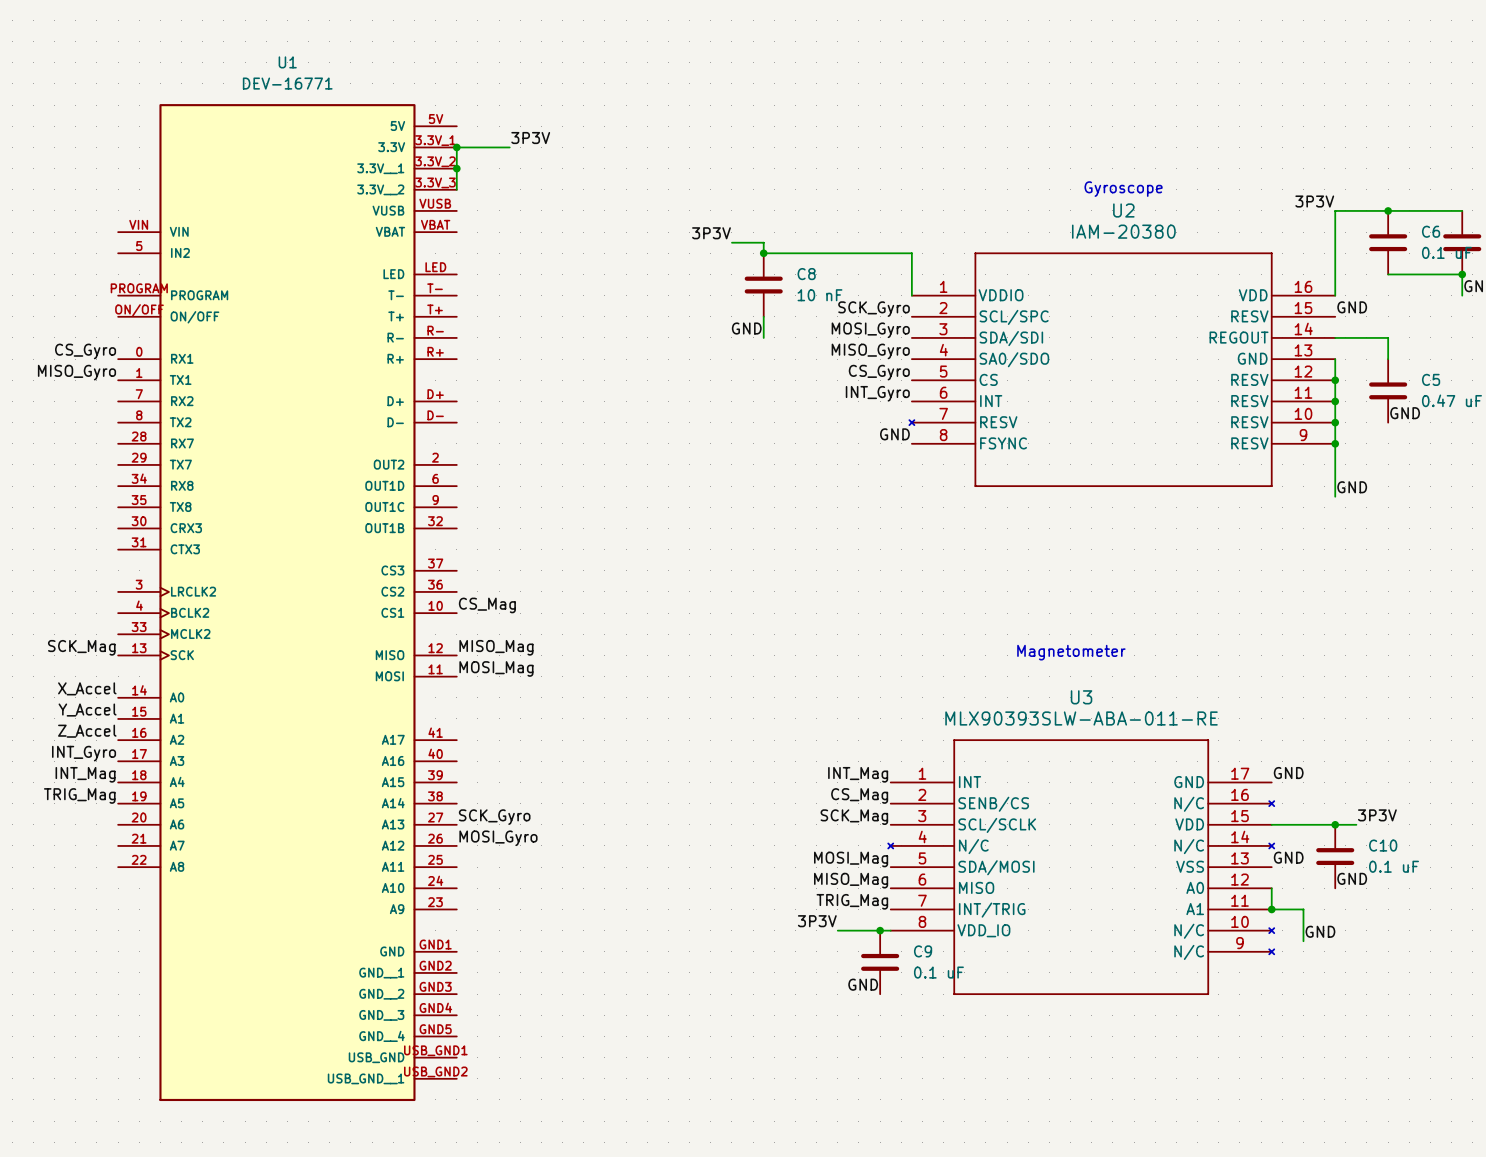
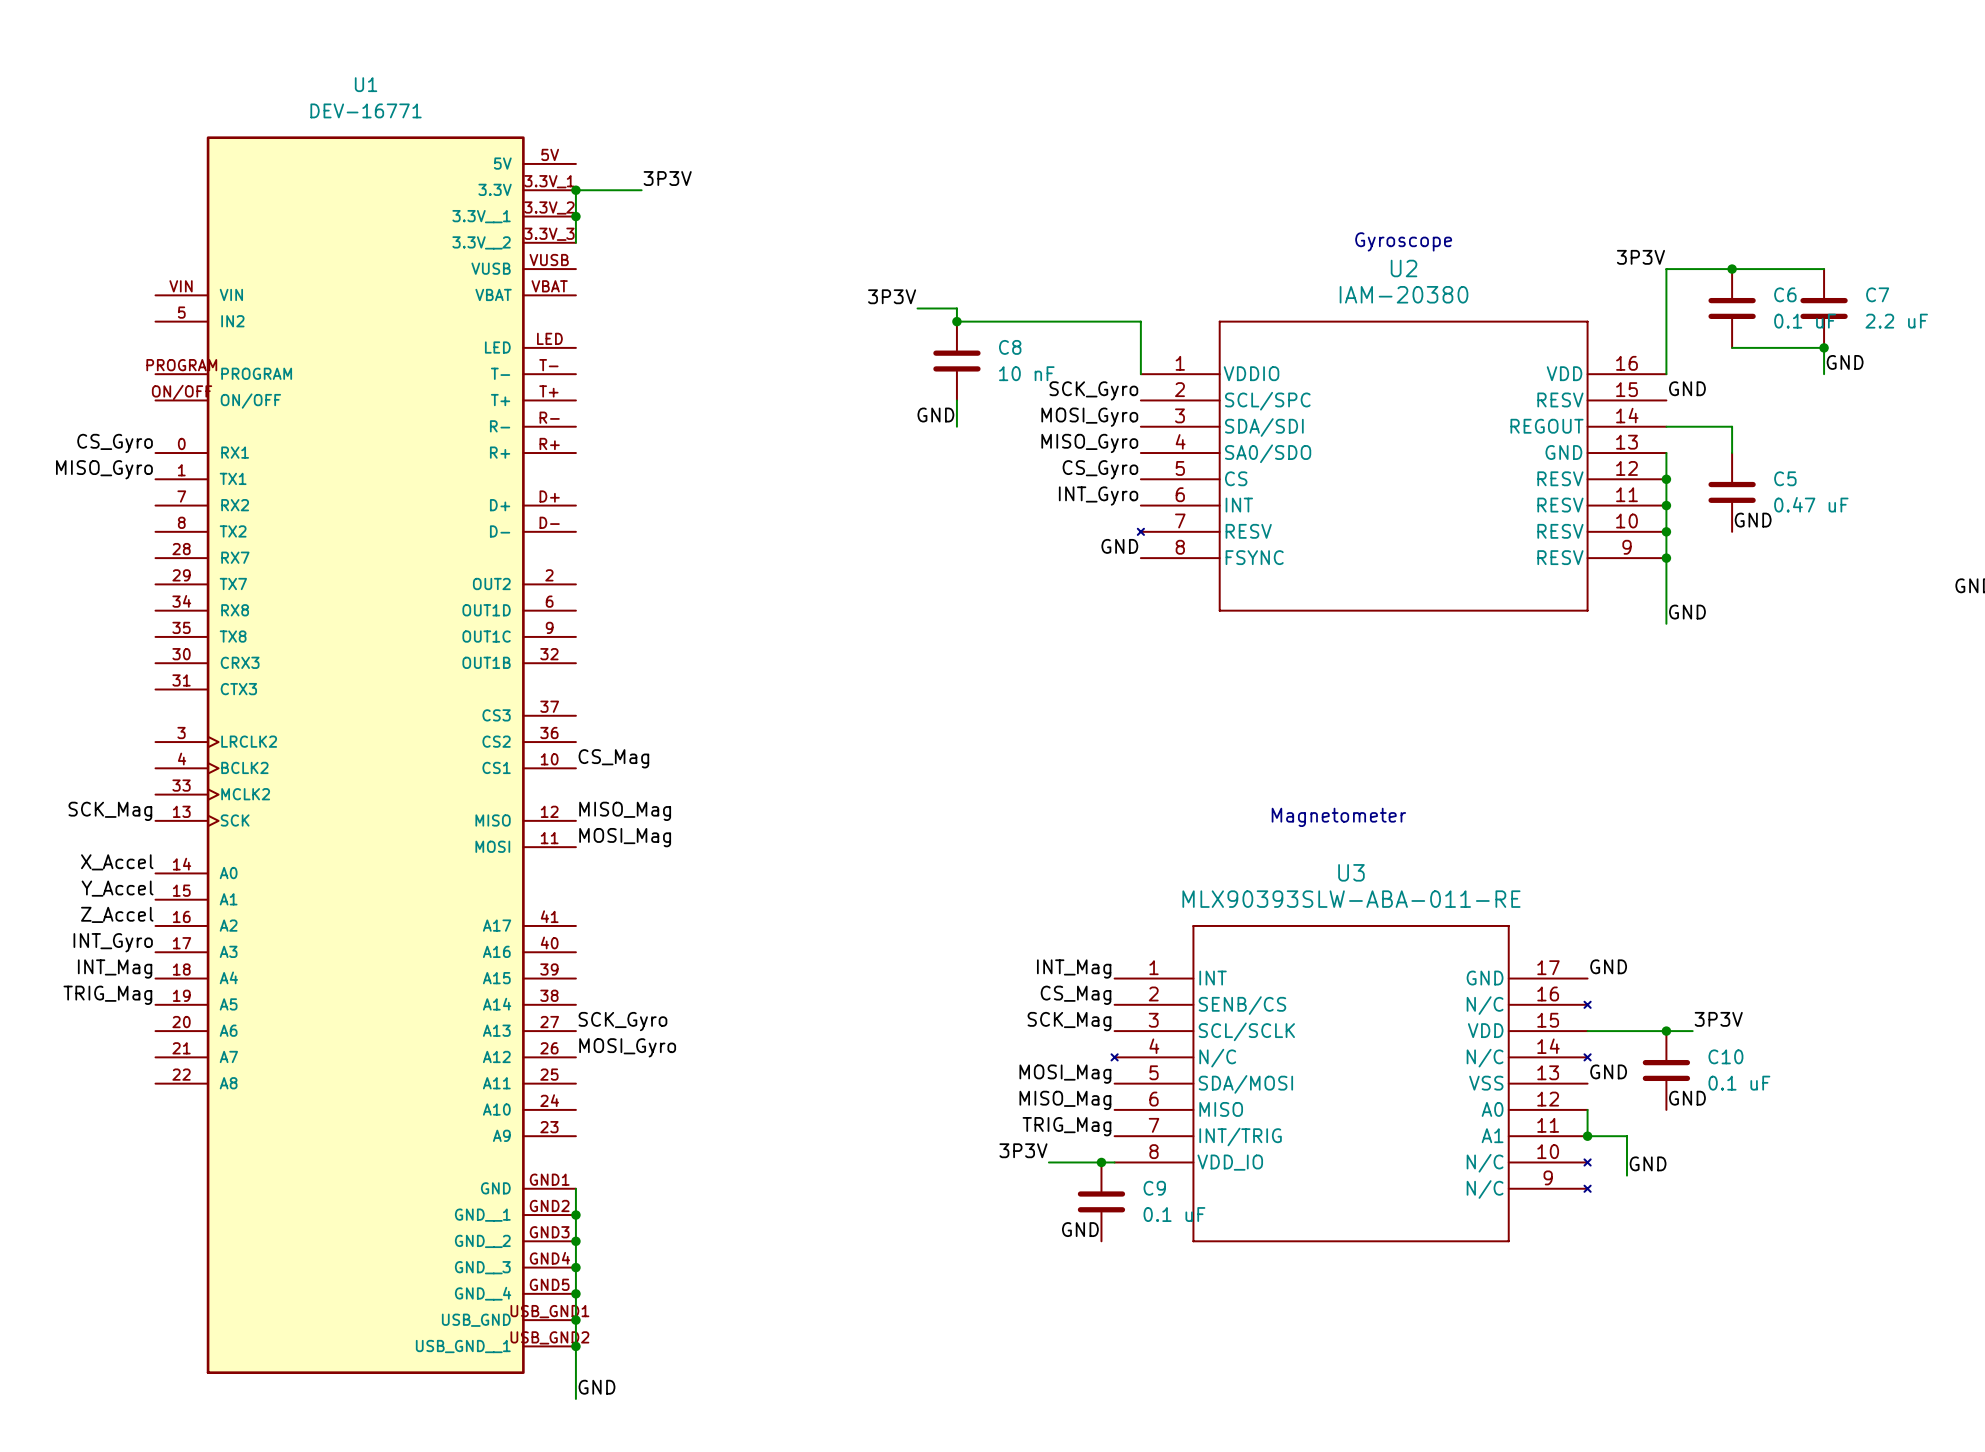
wire: none -> (575, 1188) (575, 1398)
junction: none -> (575, 1215)
junction: none -> (575, 1241)
junction: none -> (575, 1267)
junction: none -> (575, 1293)
junction: none -> (575, 1320)
junction: none -> (575, 1346)
label: none -> GND (596, 1387)

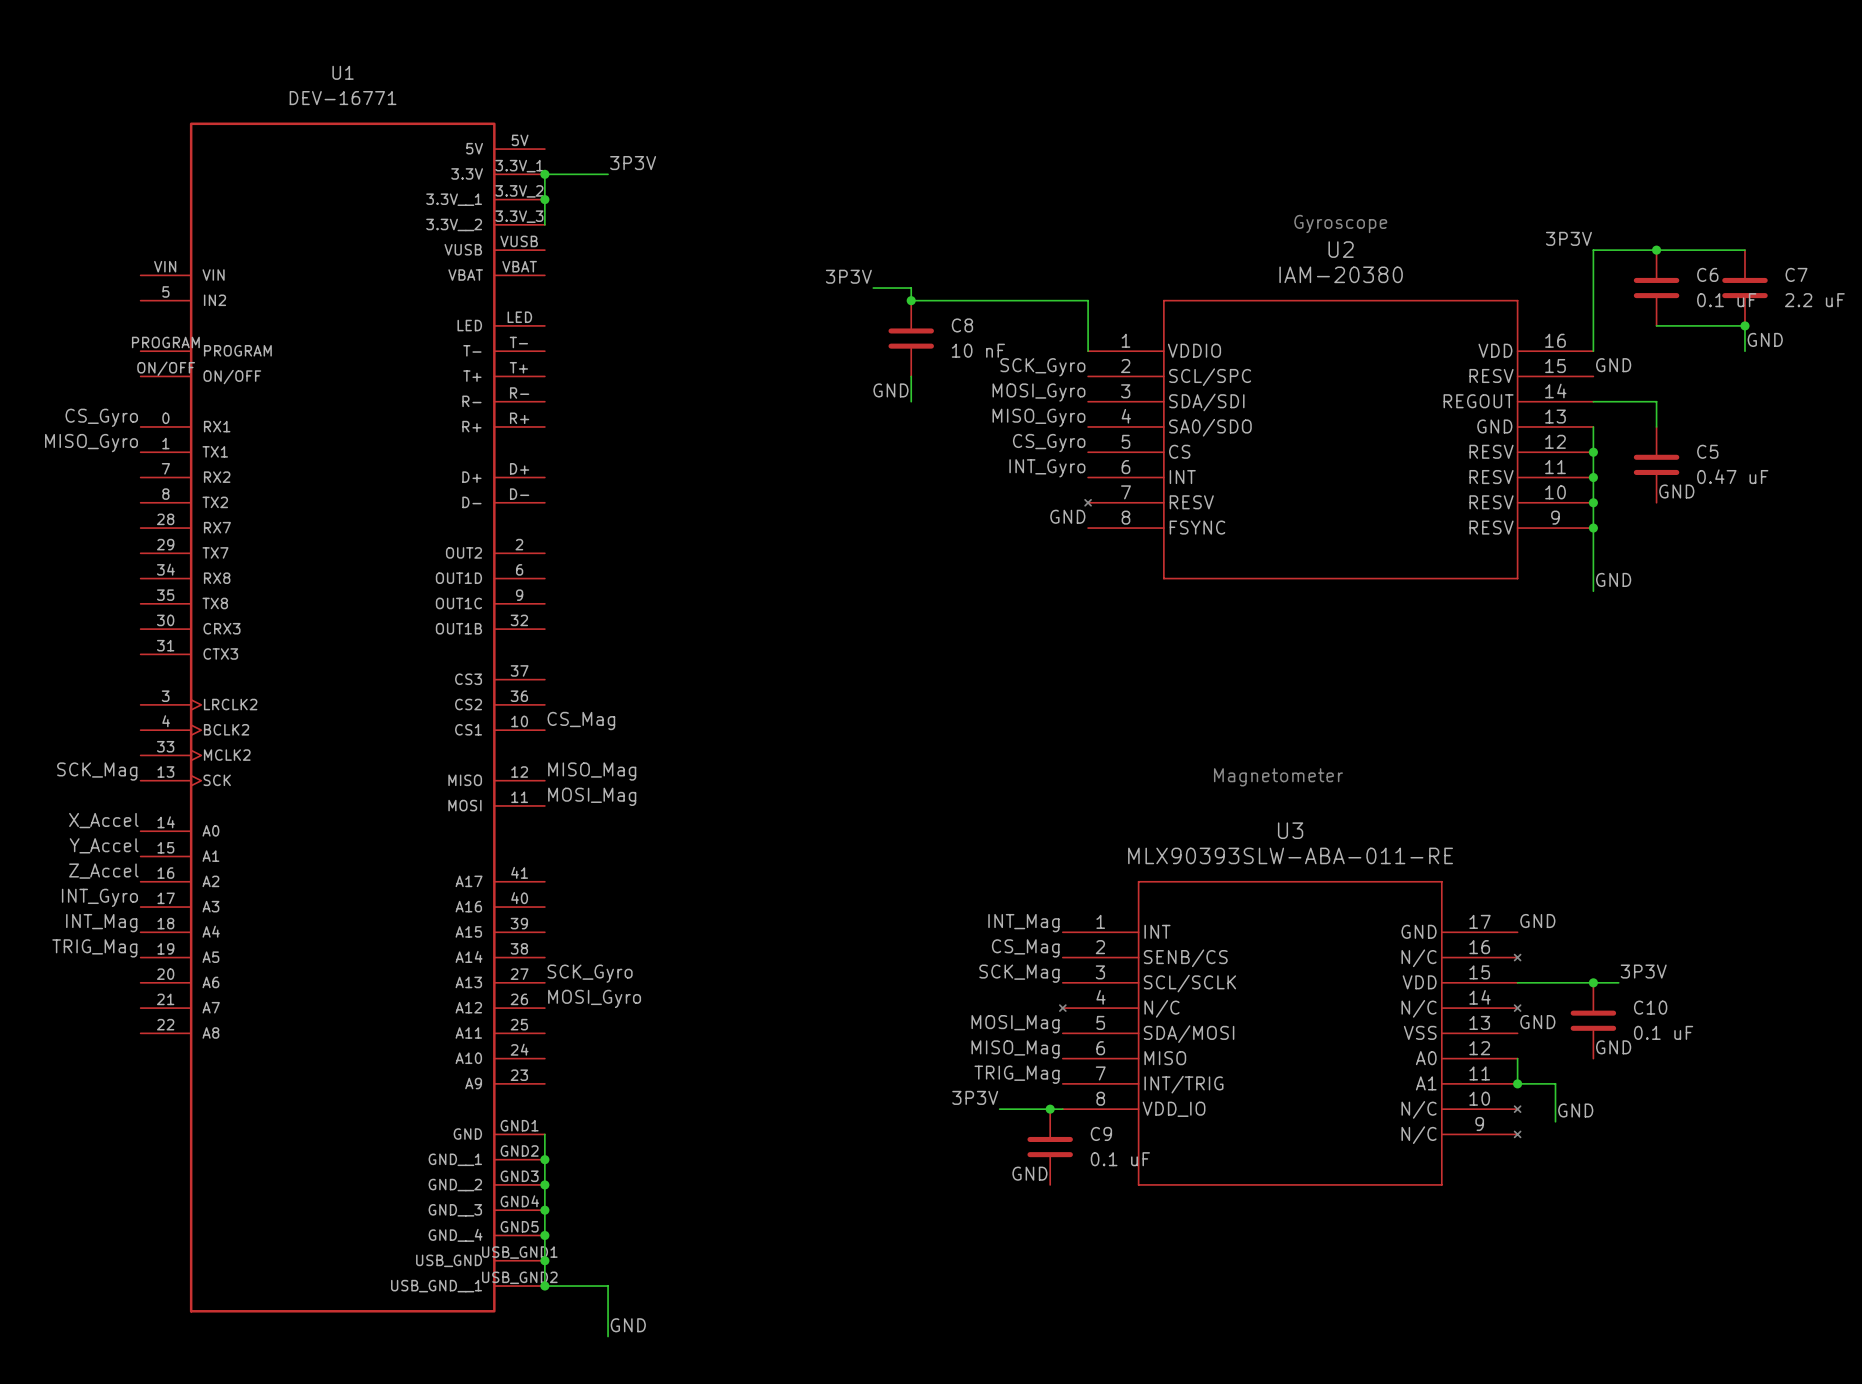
wire: (575, 1346) (575, 1398) -> (544, 1286) (608, 1286) (608, 1336)
label position: GND (596, 1387) -> GND (628, 1325)

